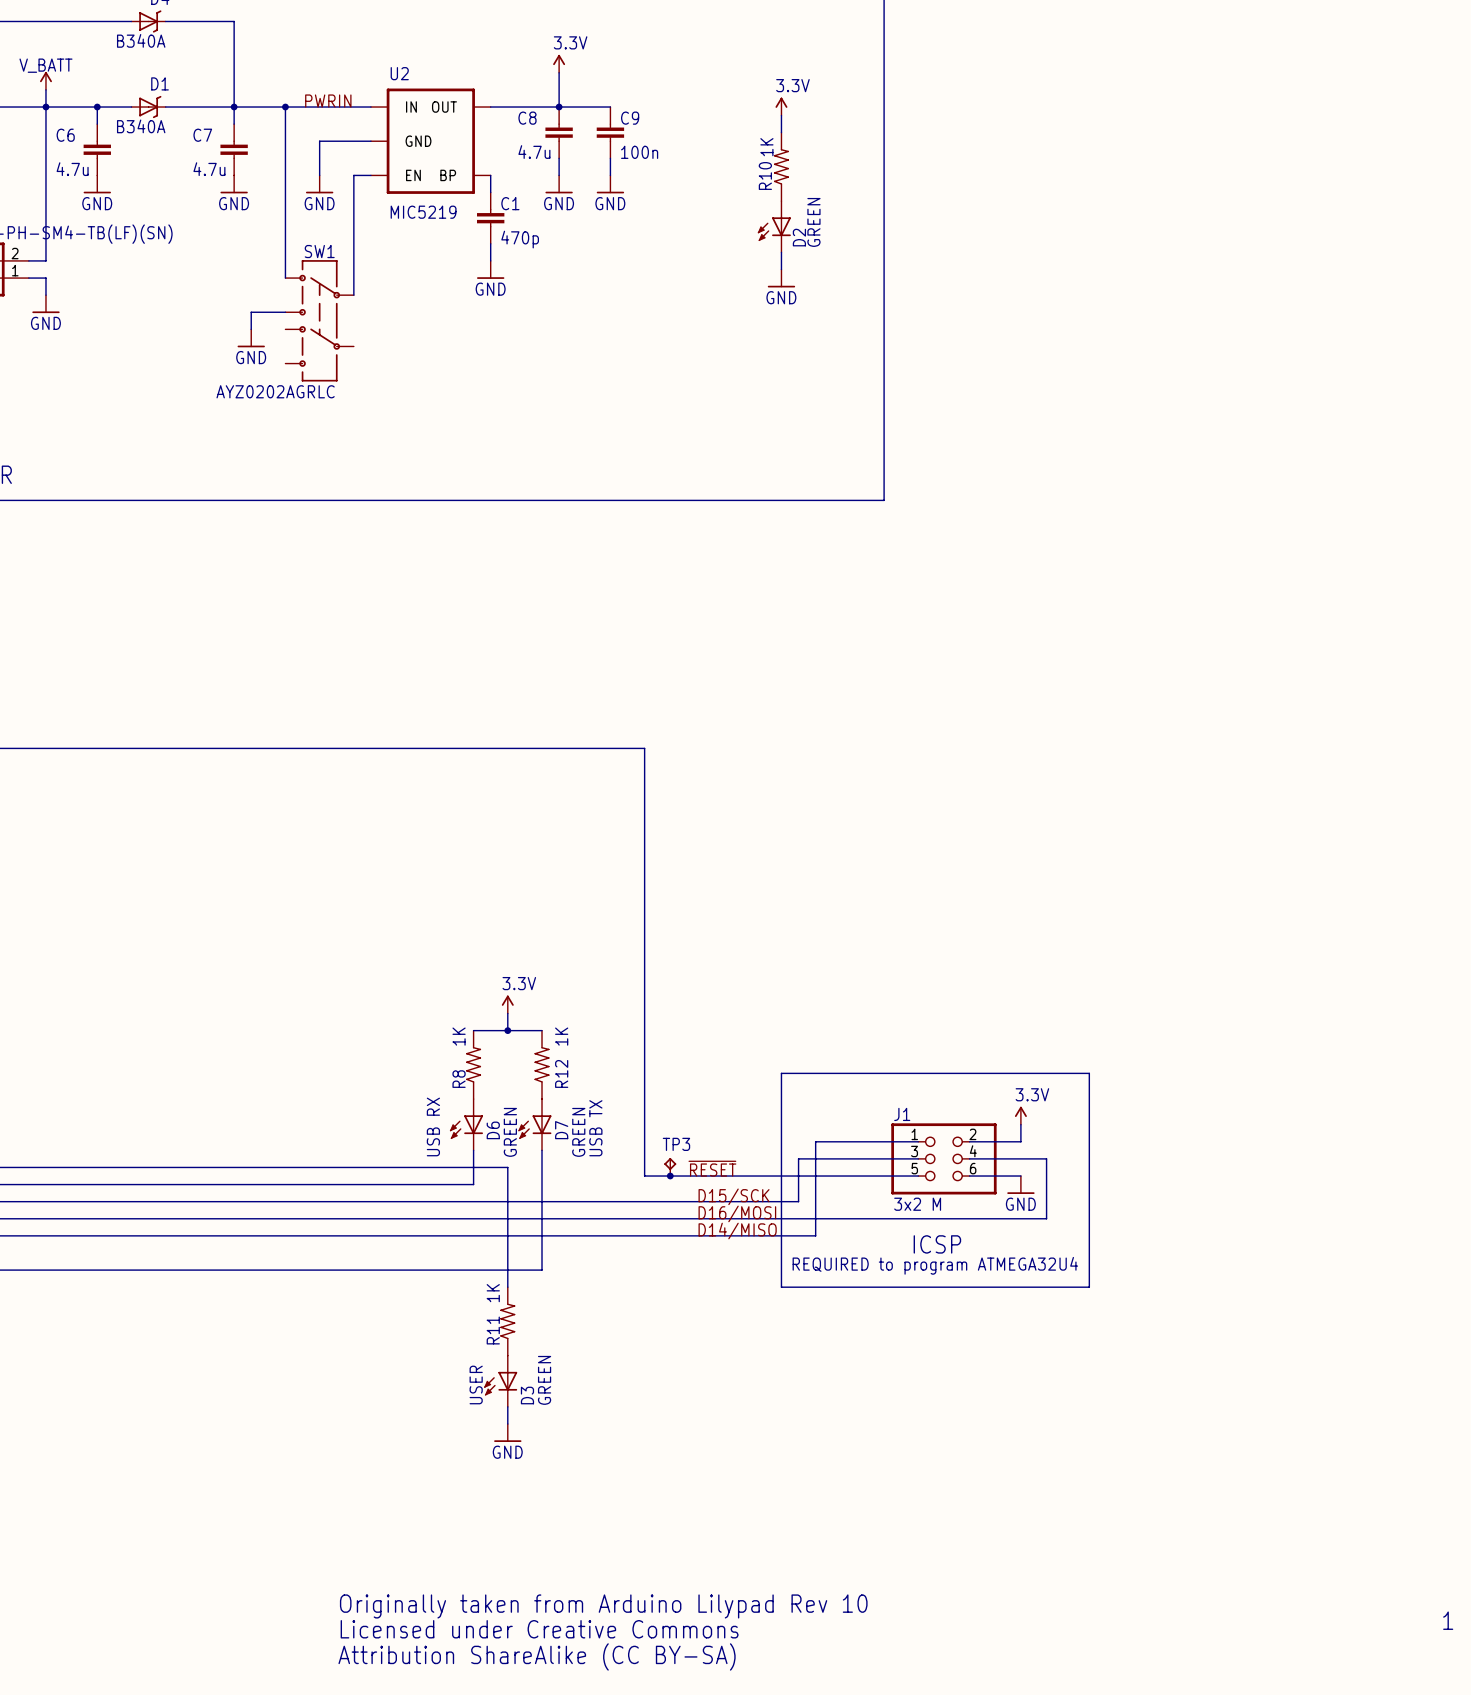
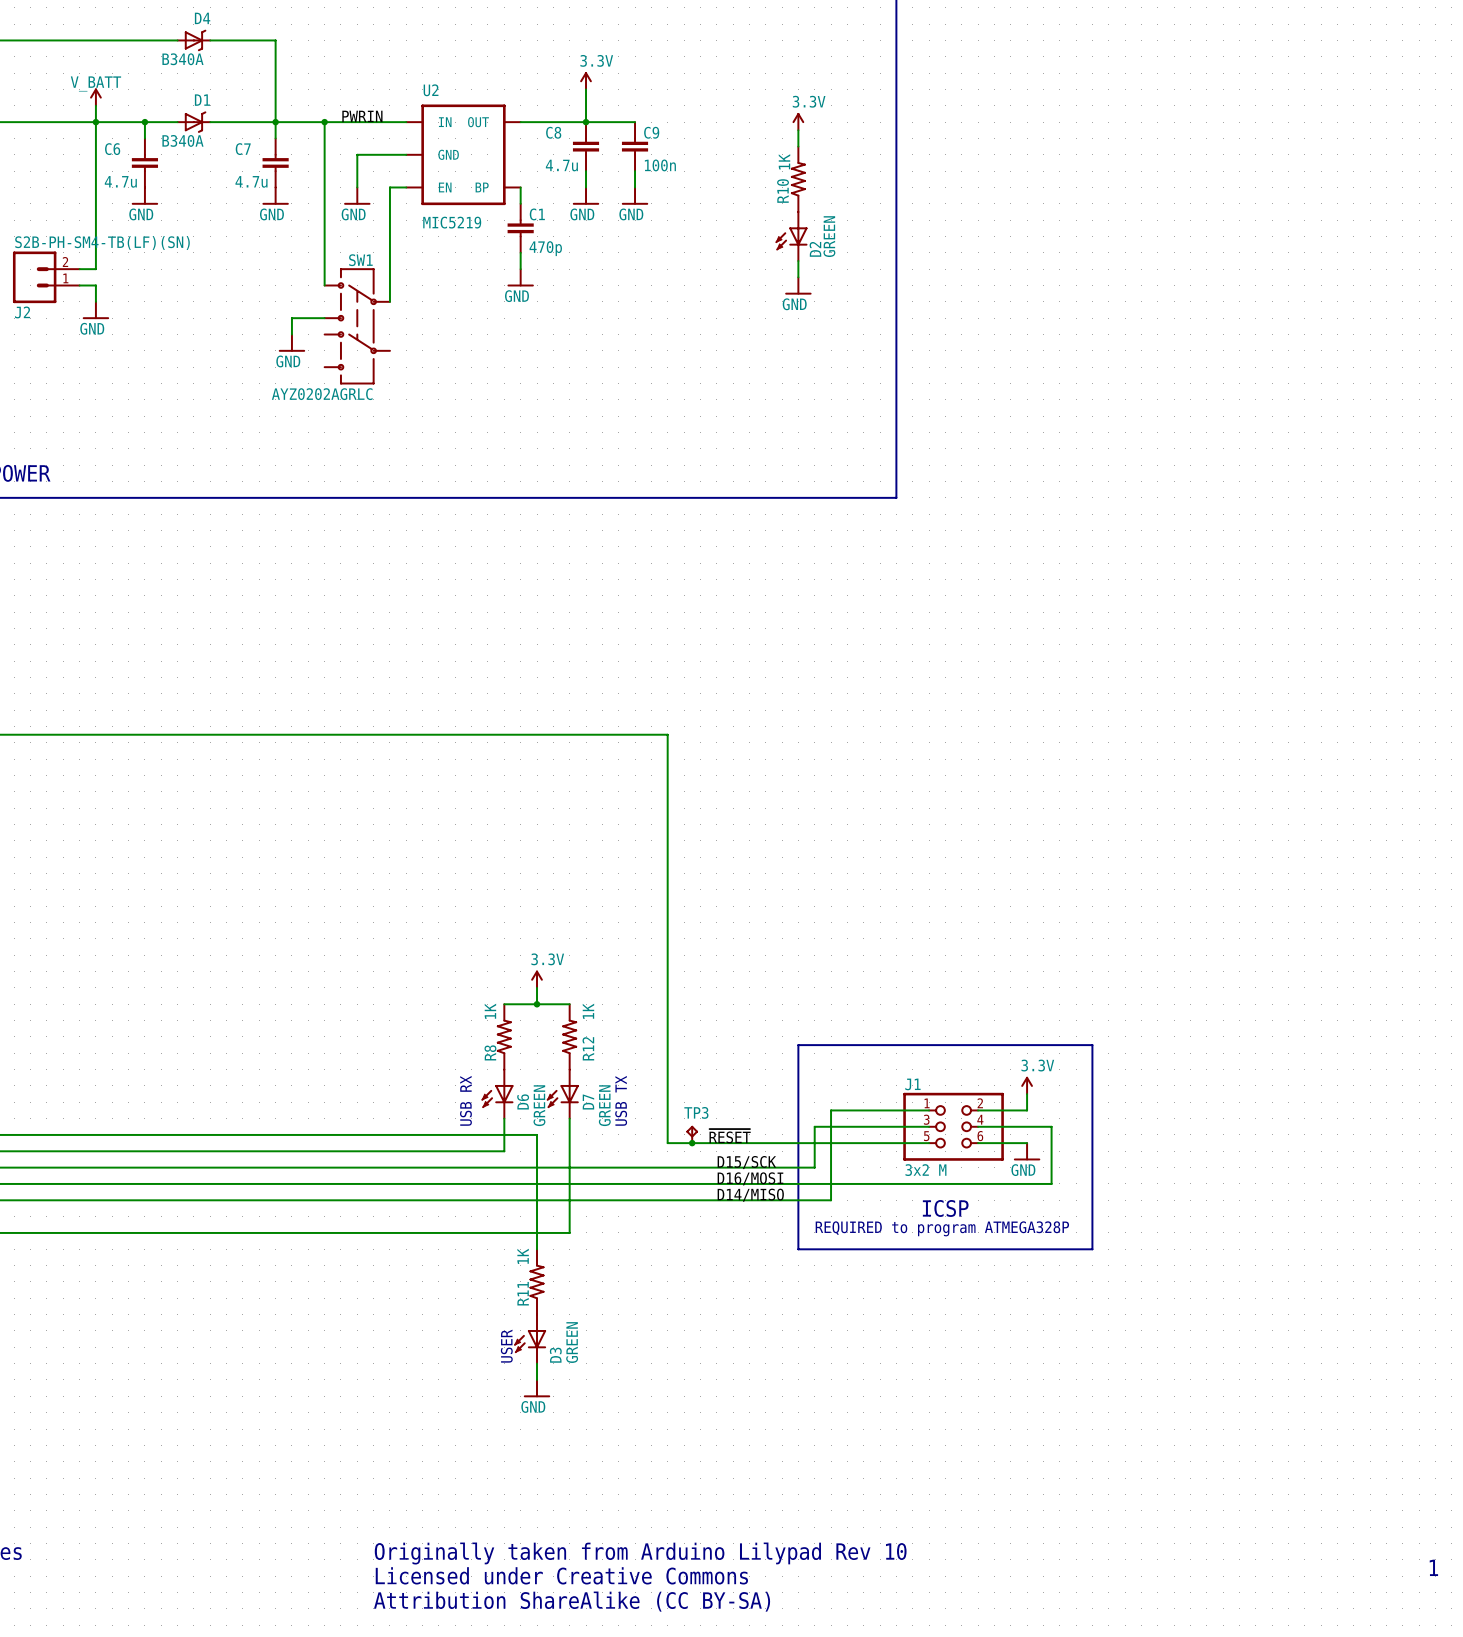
text: REQUIRED to program ATMEGA32U4 (935, 1265) -> REQUIRED to program ATMEGA328P (942, 1228)

